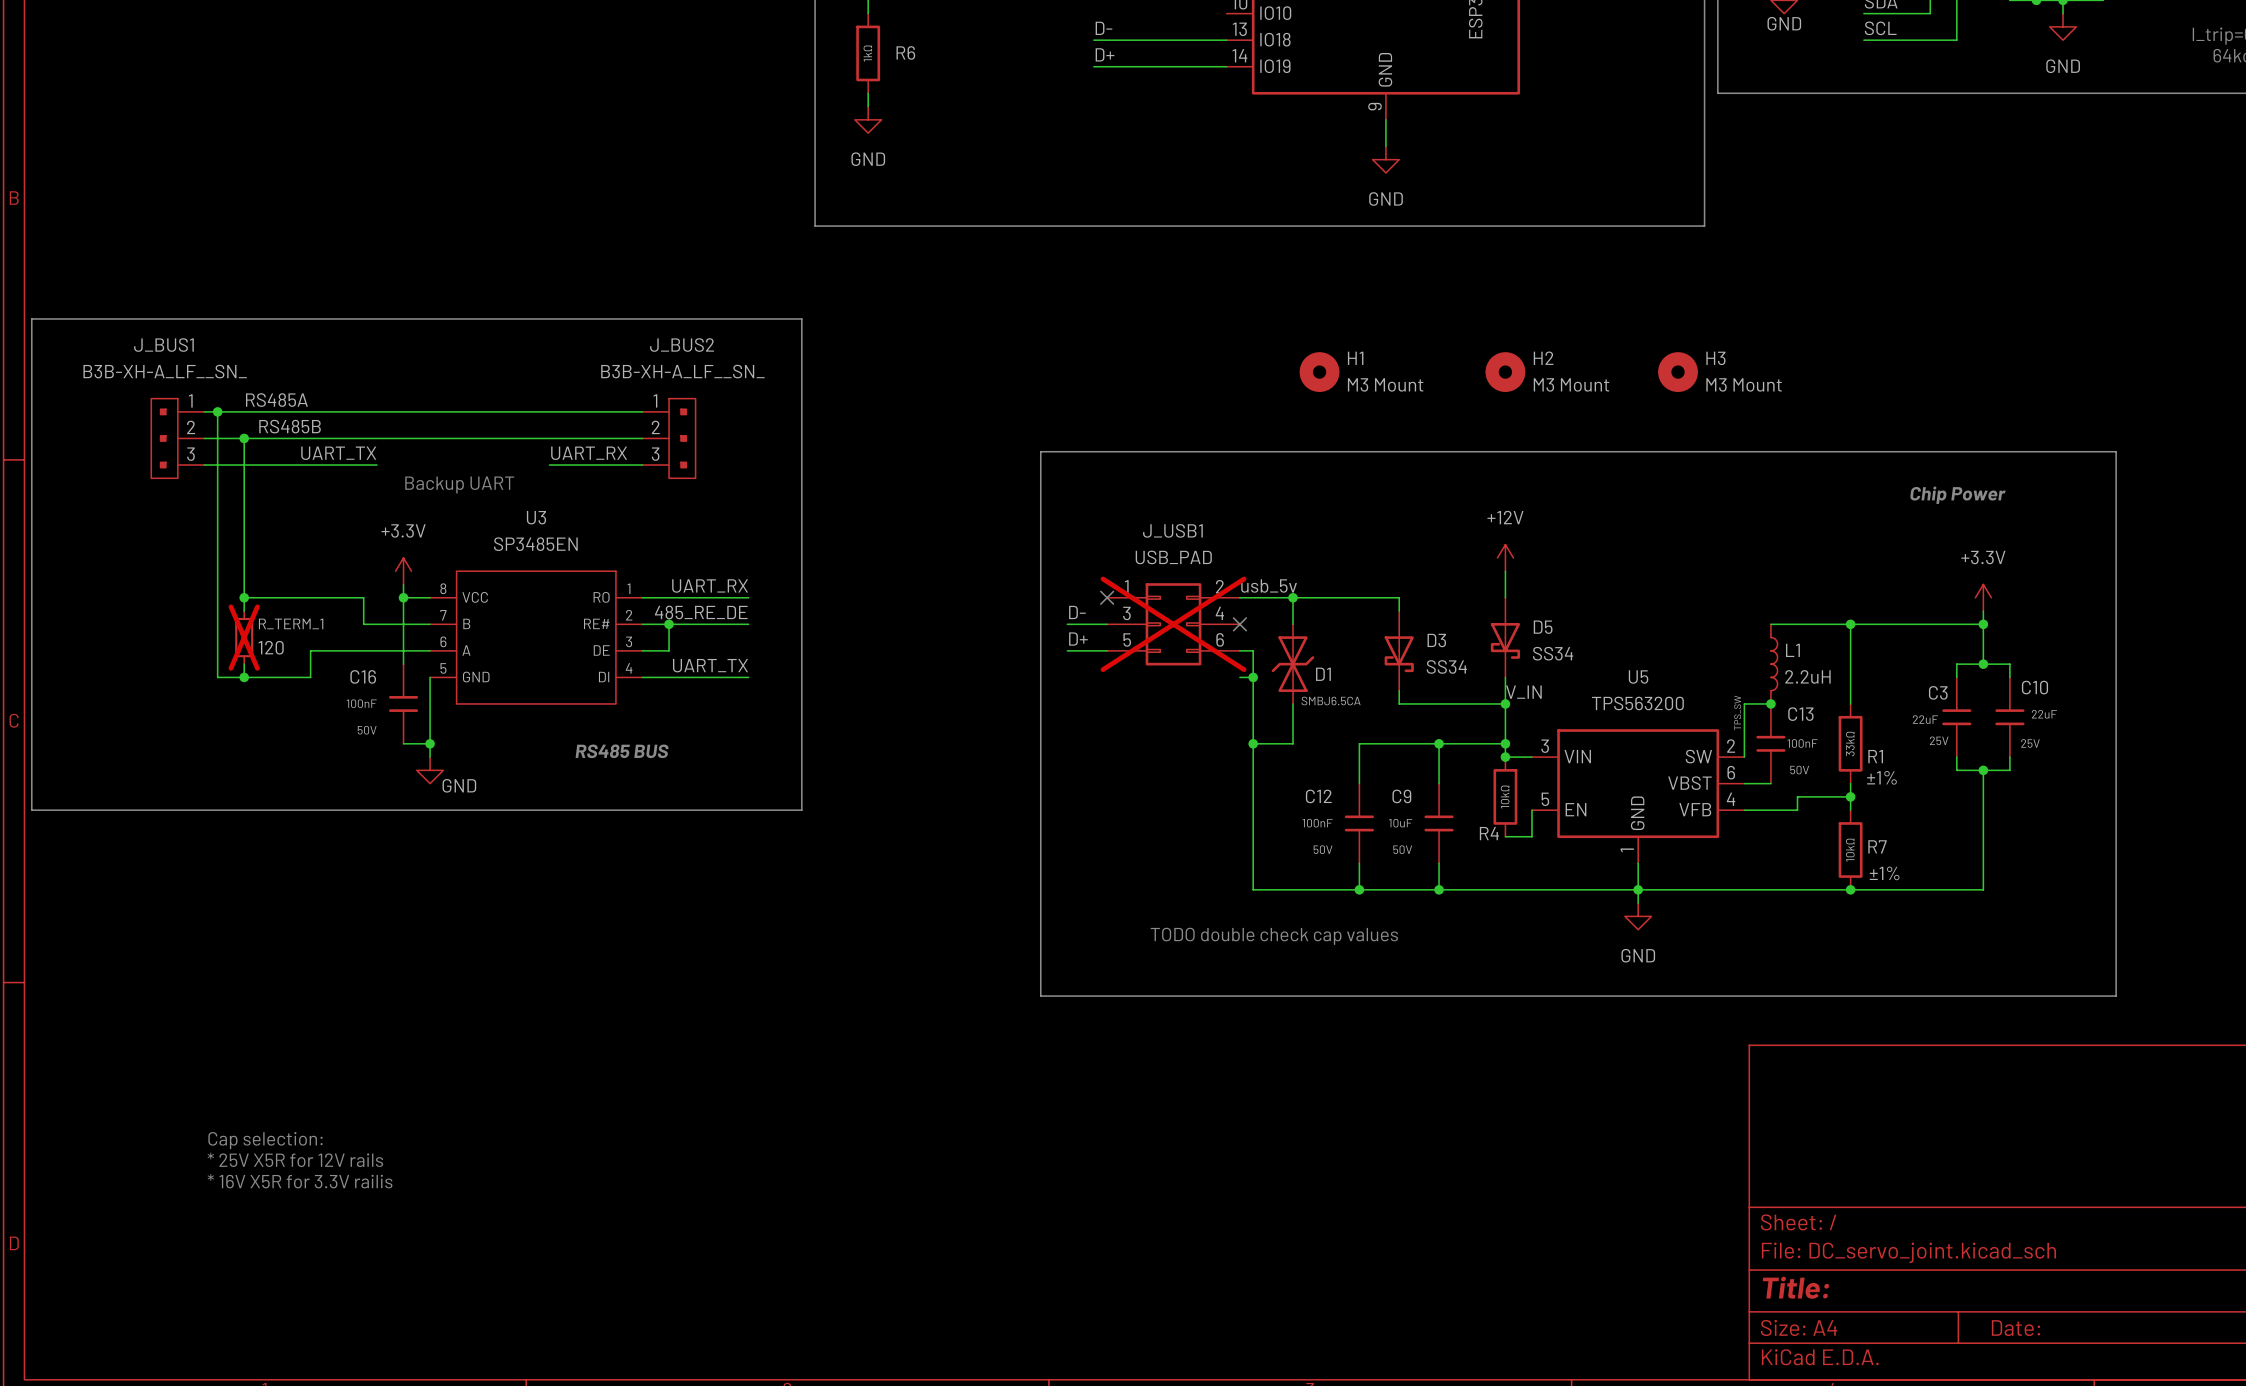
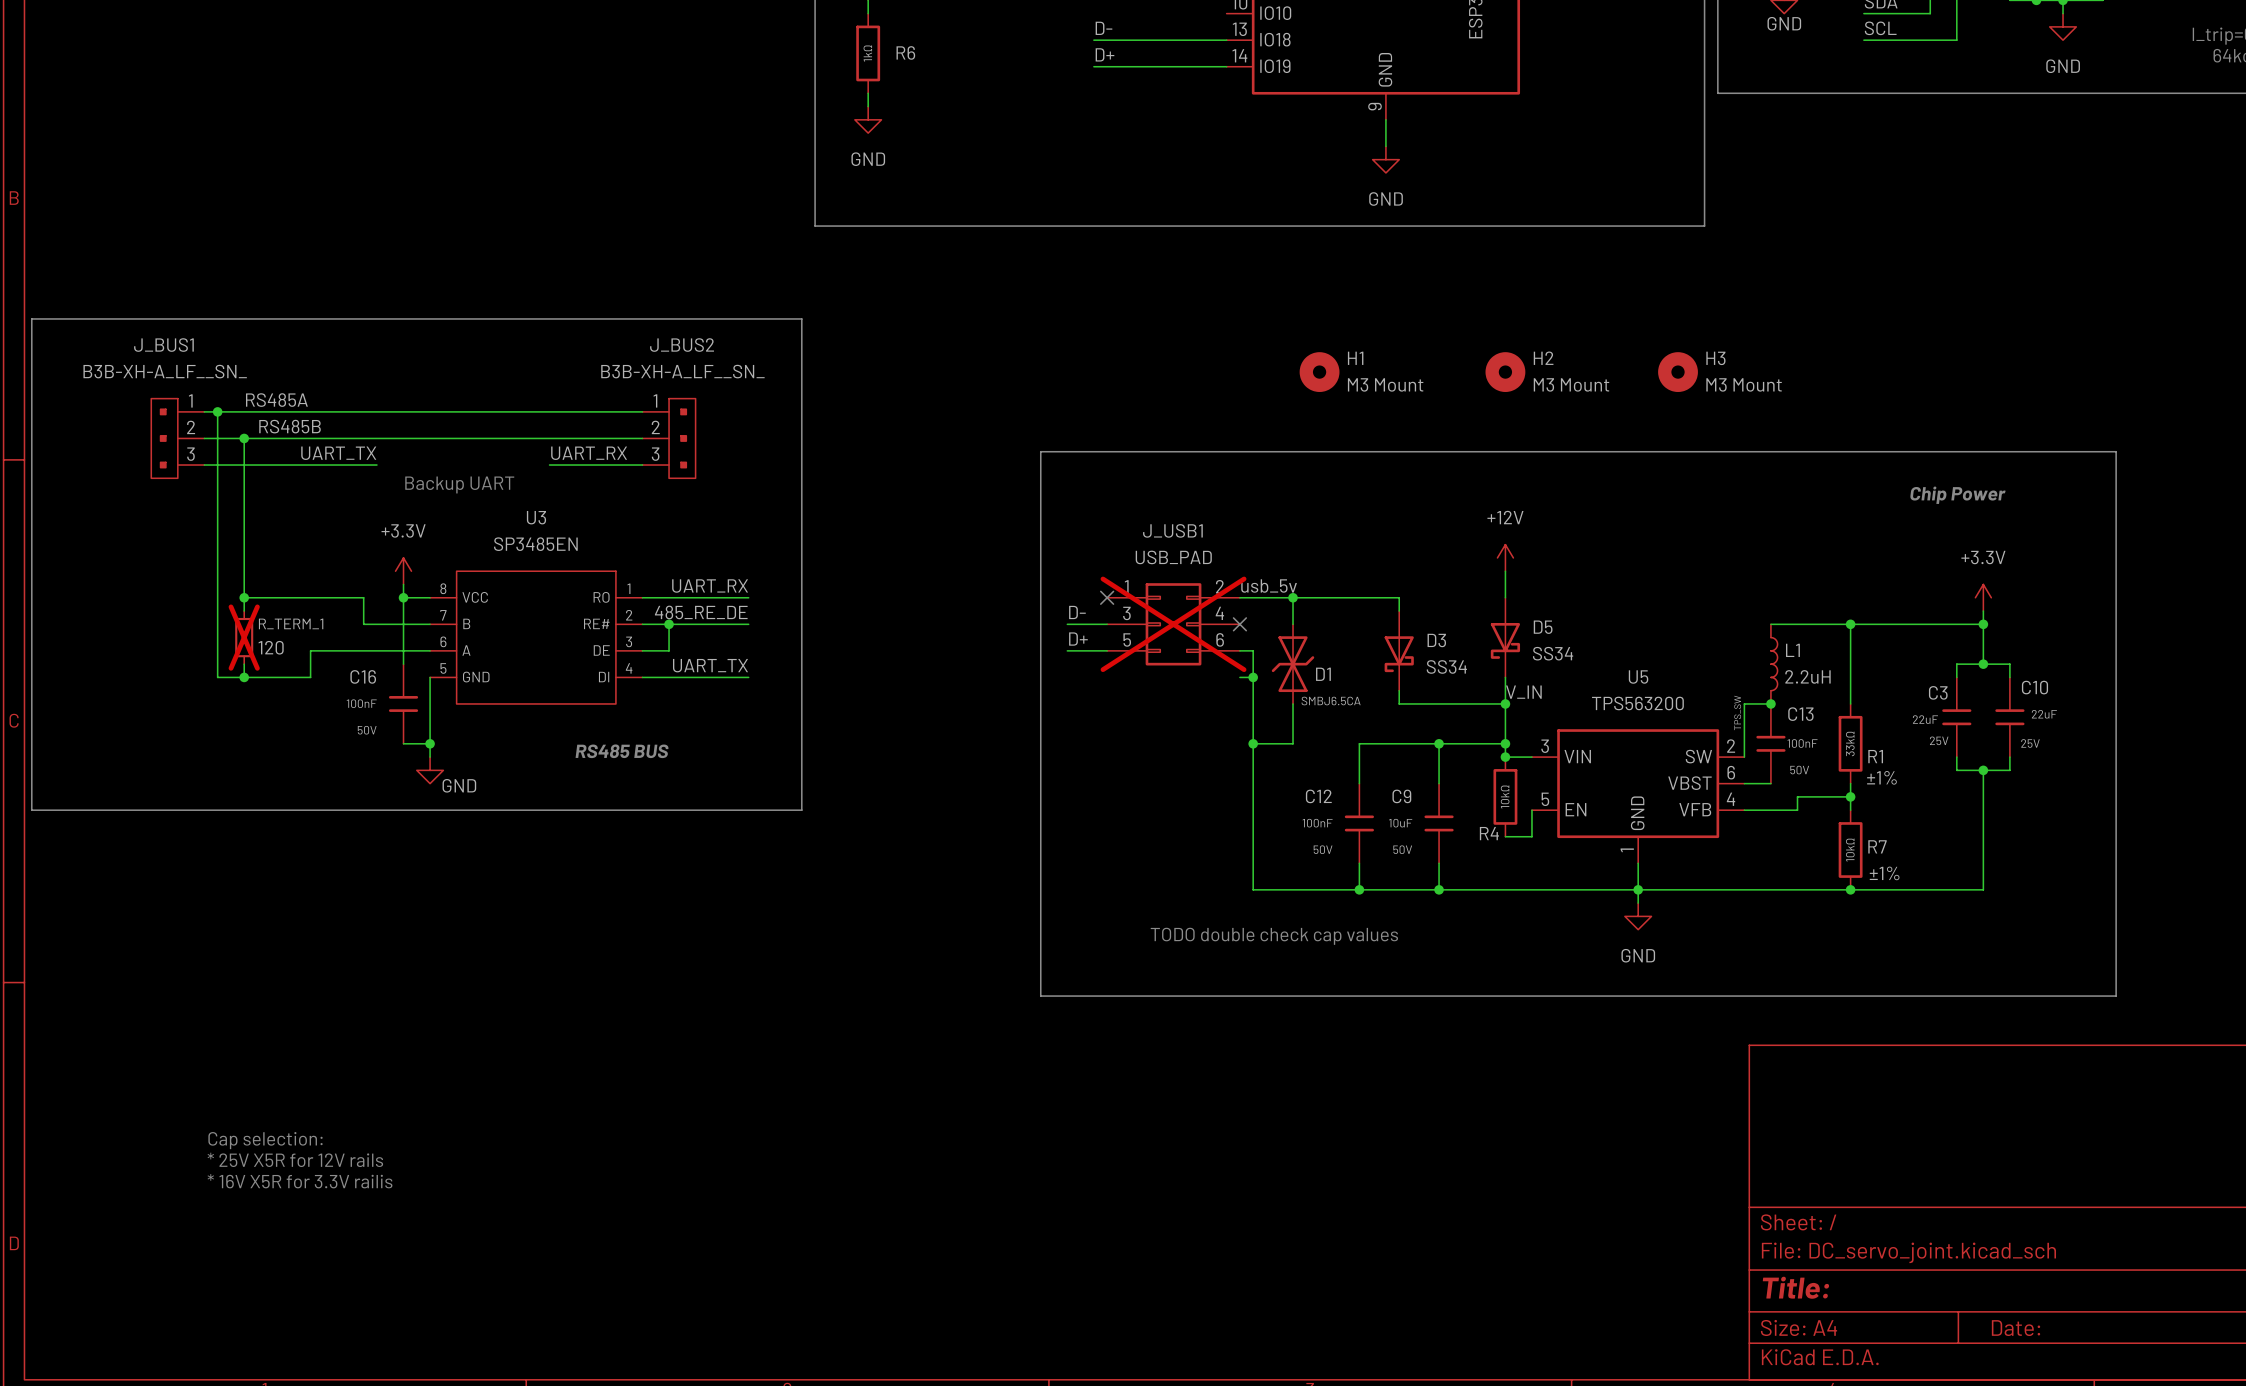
D5 symbol: [1490, 597, 1521, 678] -> [1490, 597, 1521, 678]
D3 symbol: [1384, 611, 1414, 691] -> [1384, 611, 1414, 691]

